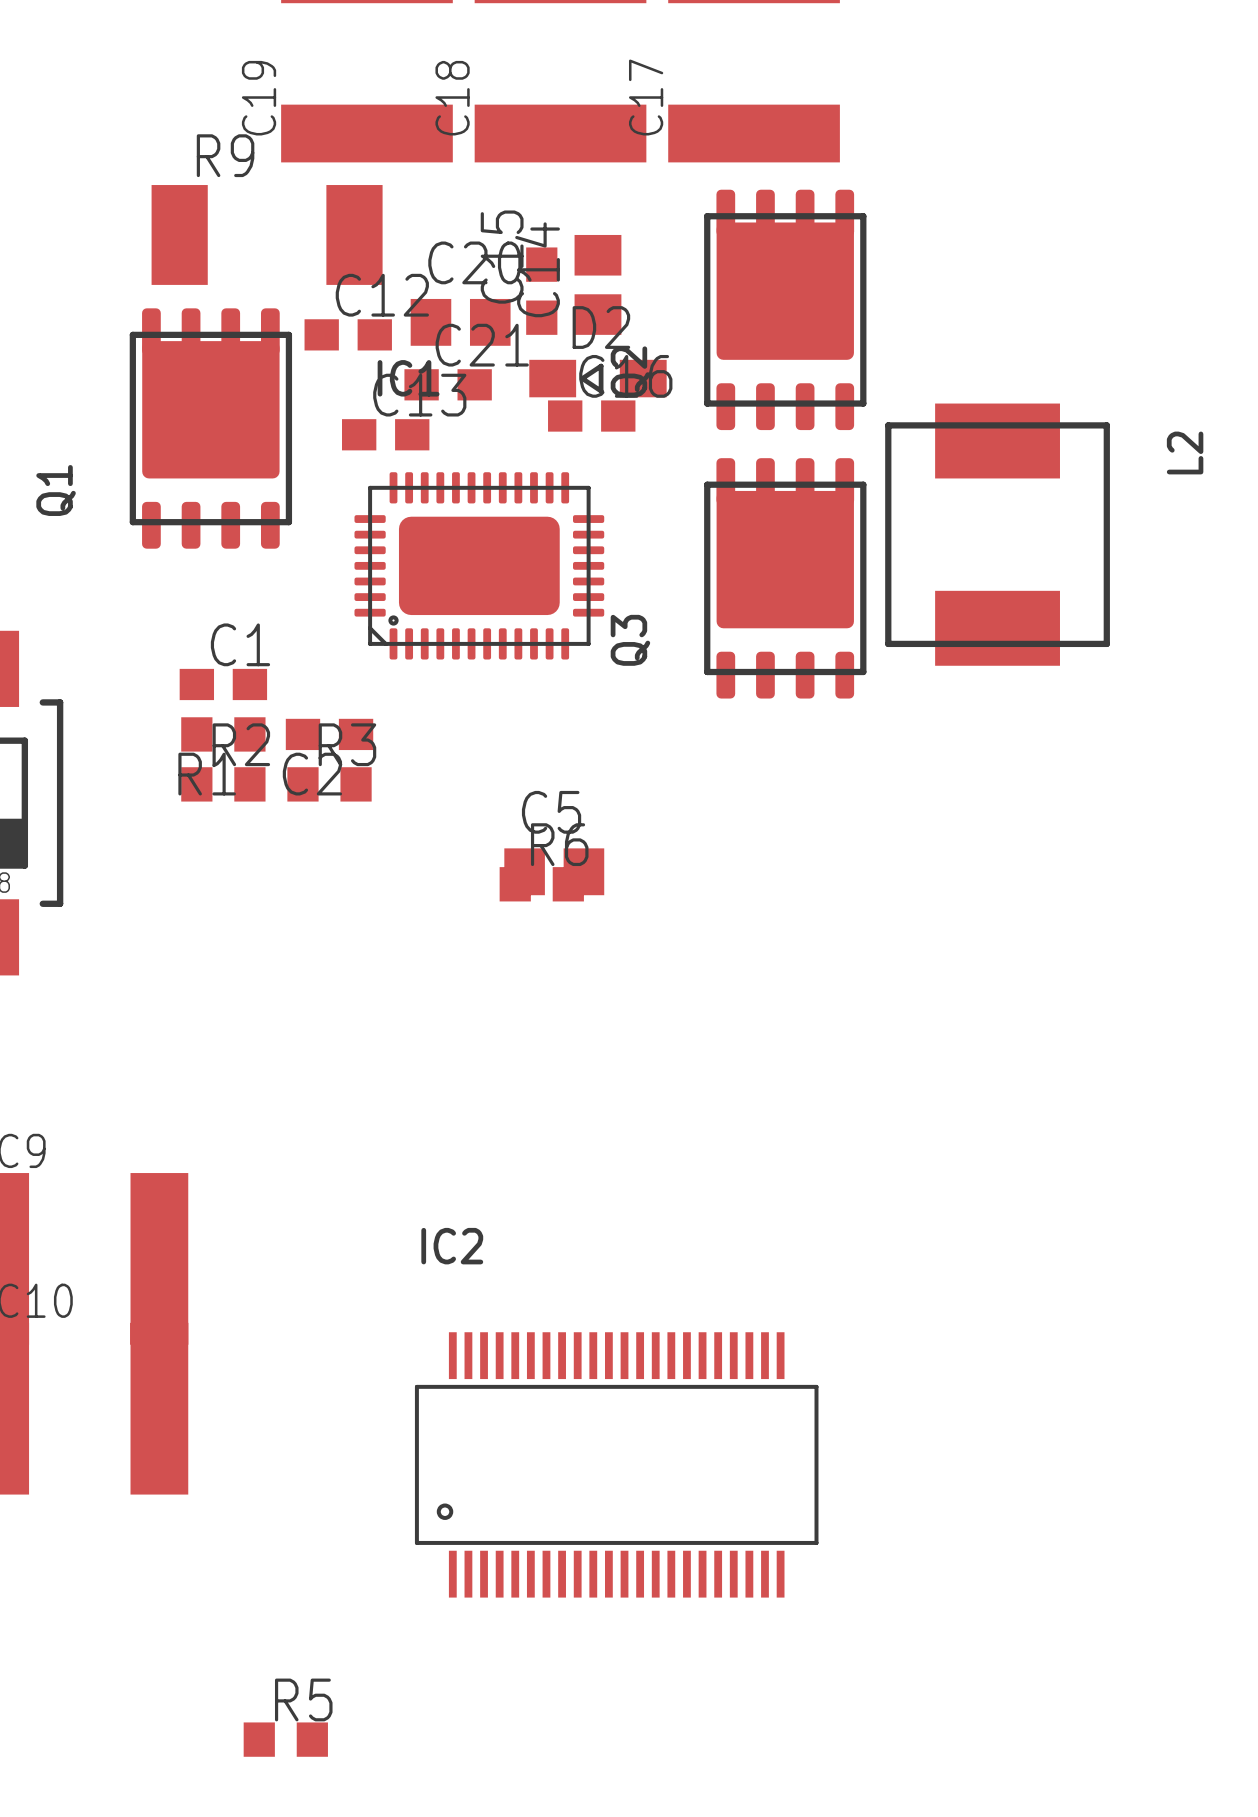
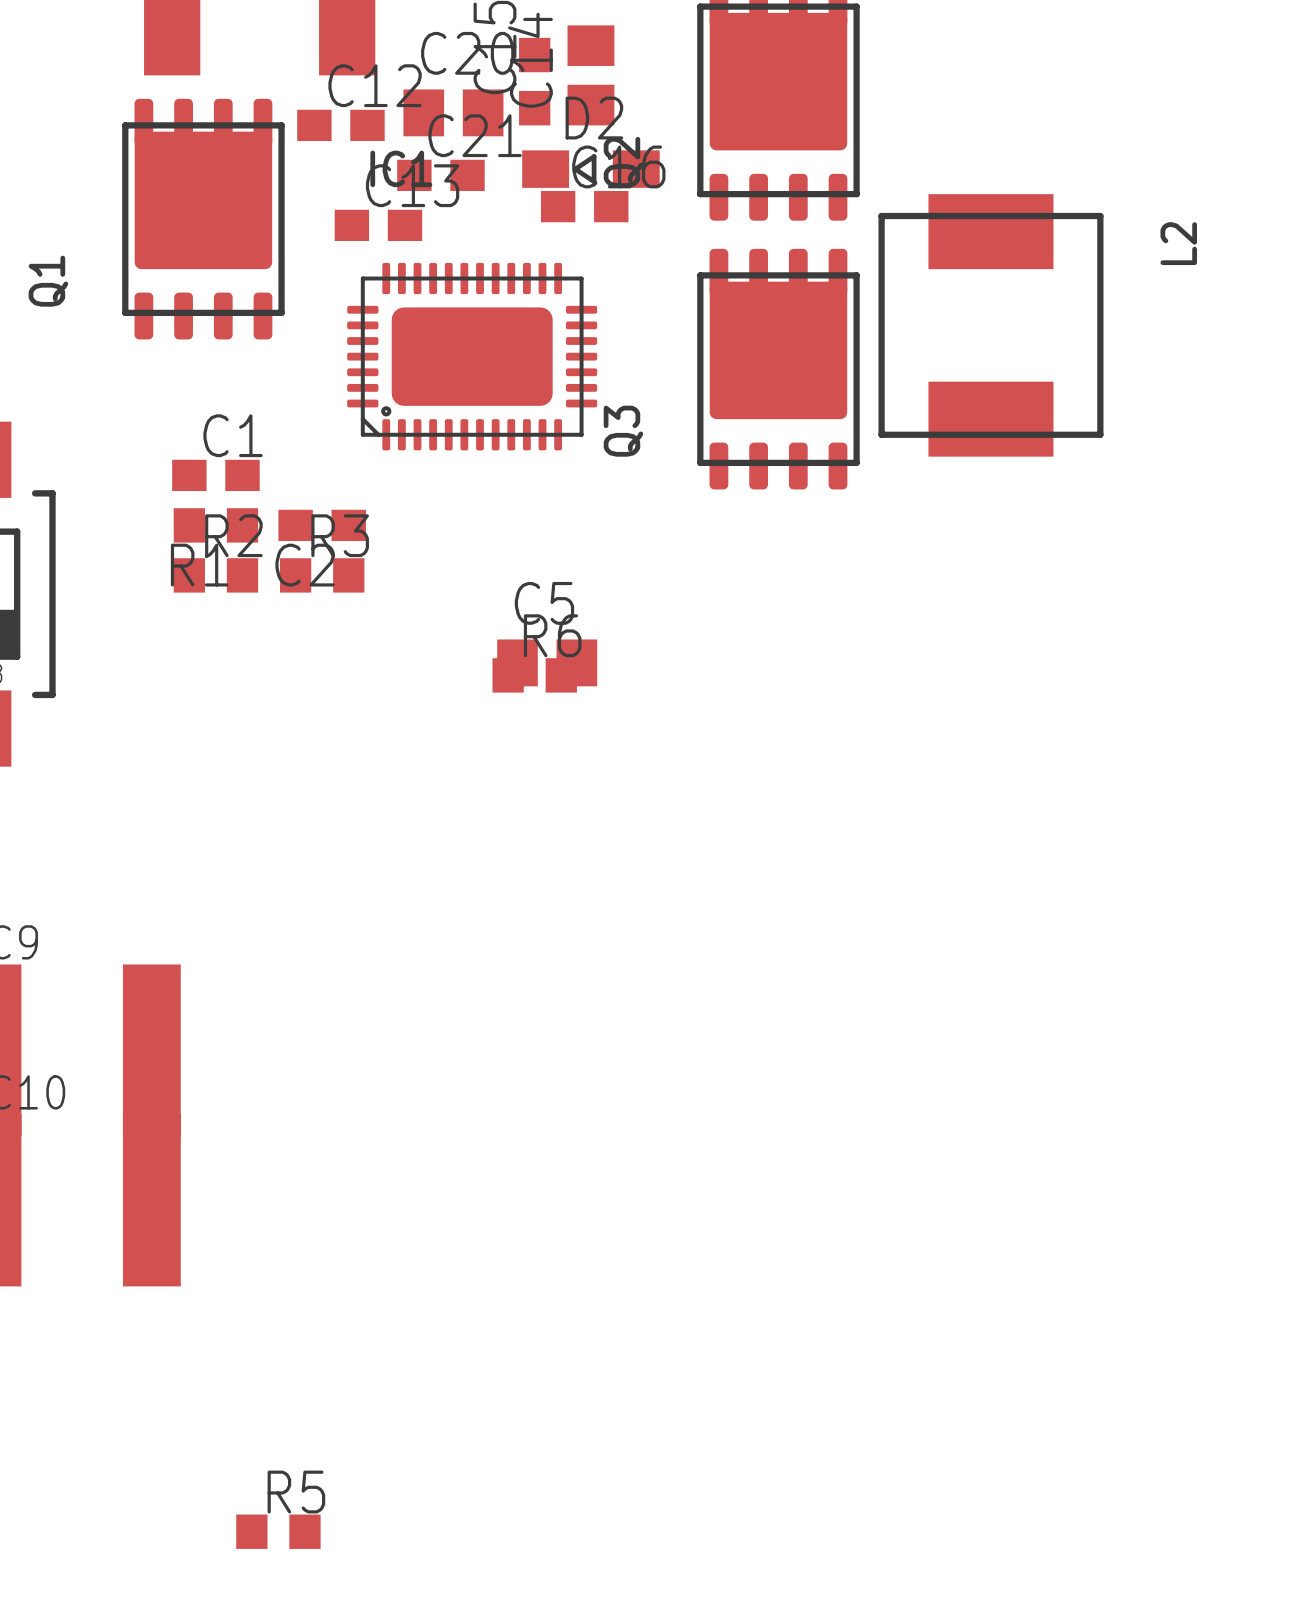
IC2: (616, 1464) -> none

